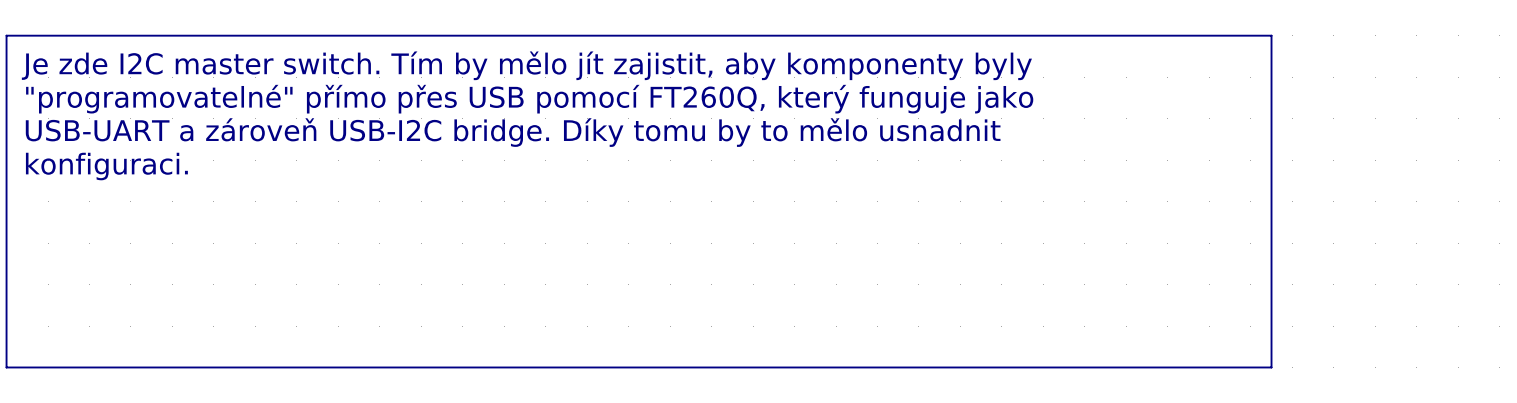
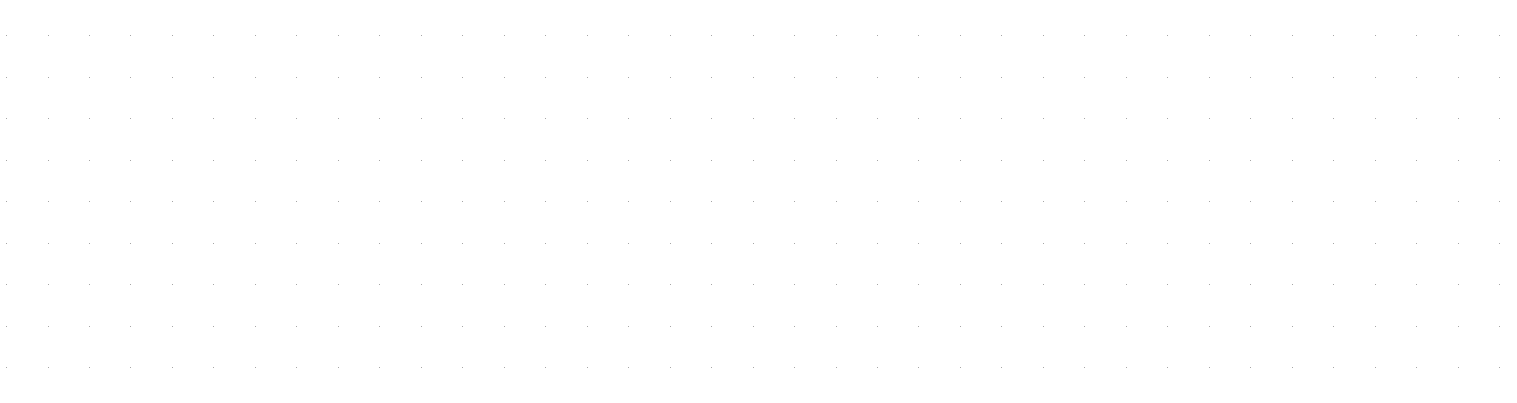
line: (6, 35) (1271, 35) (1271, 367) (6, 367) (6, 35) -> none
text: Je zde I2C master switch. Tím by mělo jít zajistit, aby komponenty byly (526, 65) -> none
text: "programovatelné" přímo přes USB pomocí FT260Q, který funguje jako (529, 99) -> none
text: USB-UART a zároveň USB-I2C bridge. Díky tomu by to mělo usnadnit (513, 132) -> none
text: konfiguraci. (106, 166) -> none

